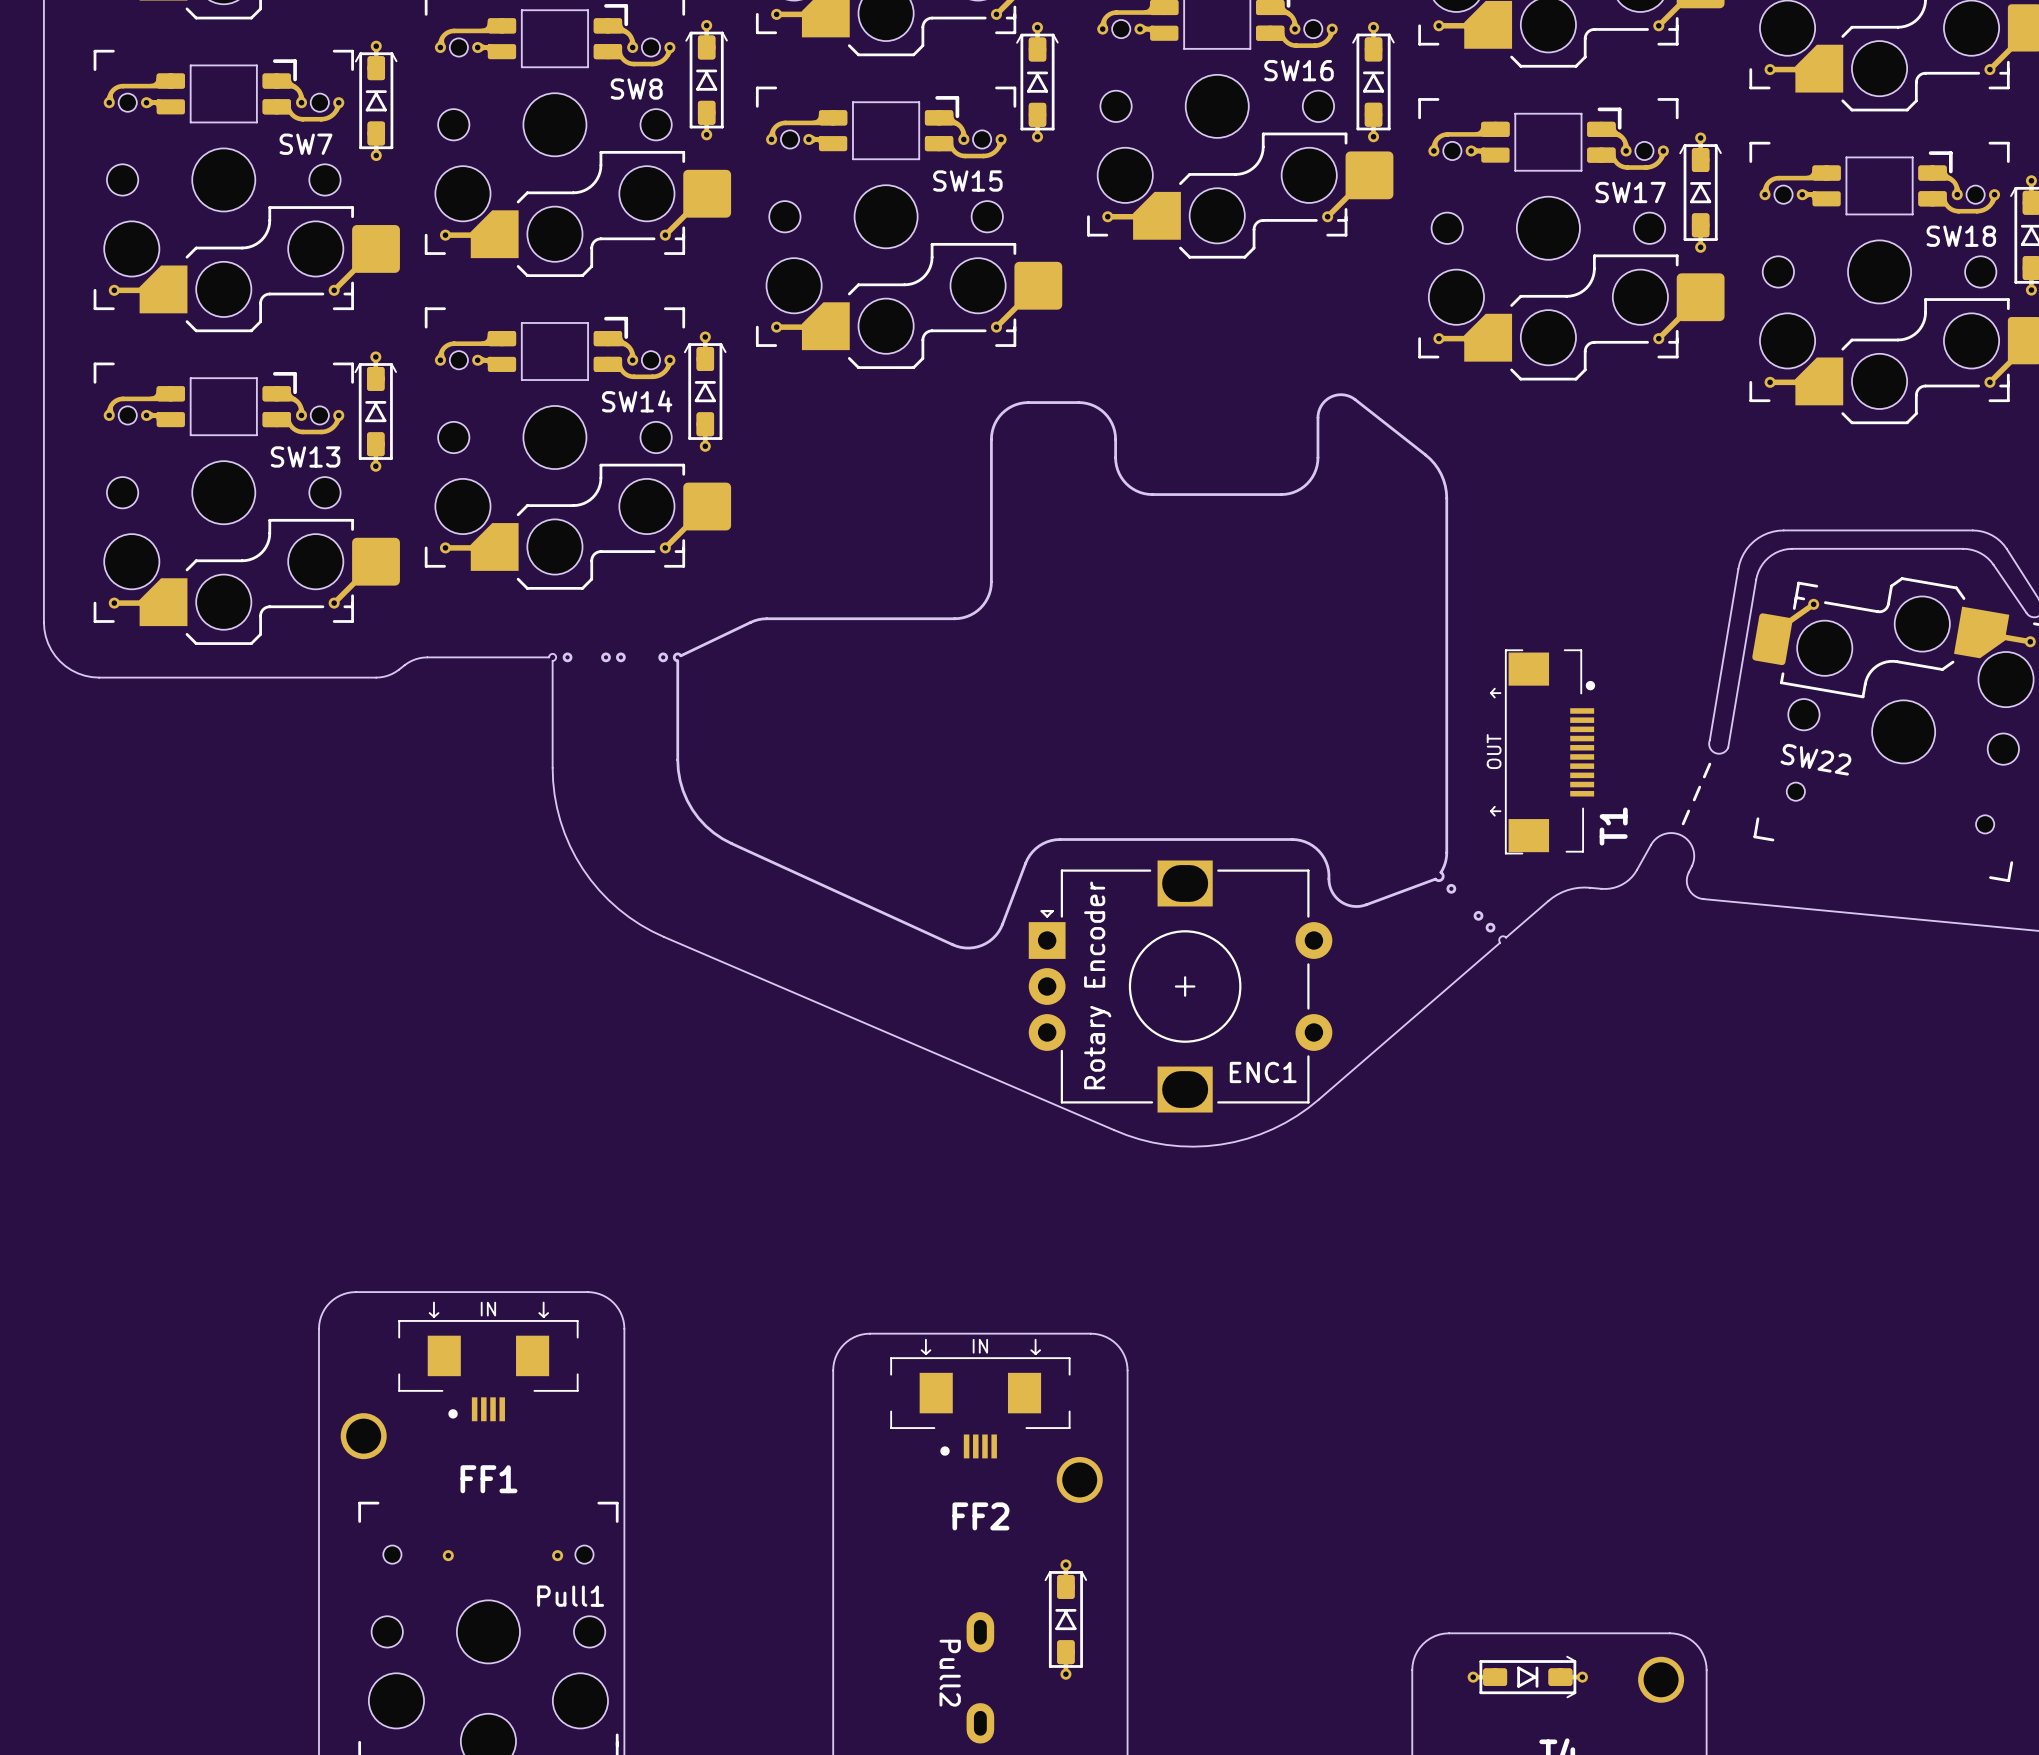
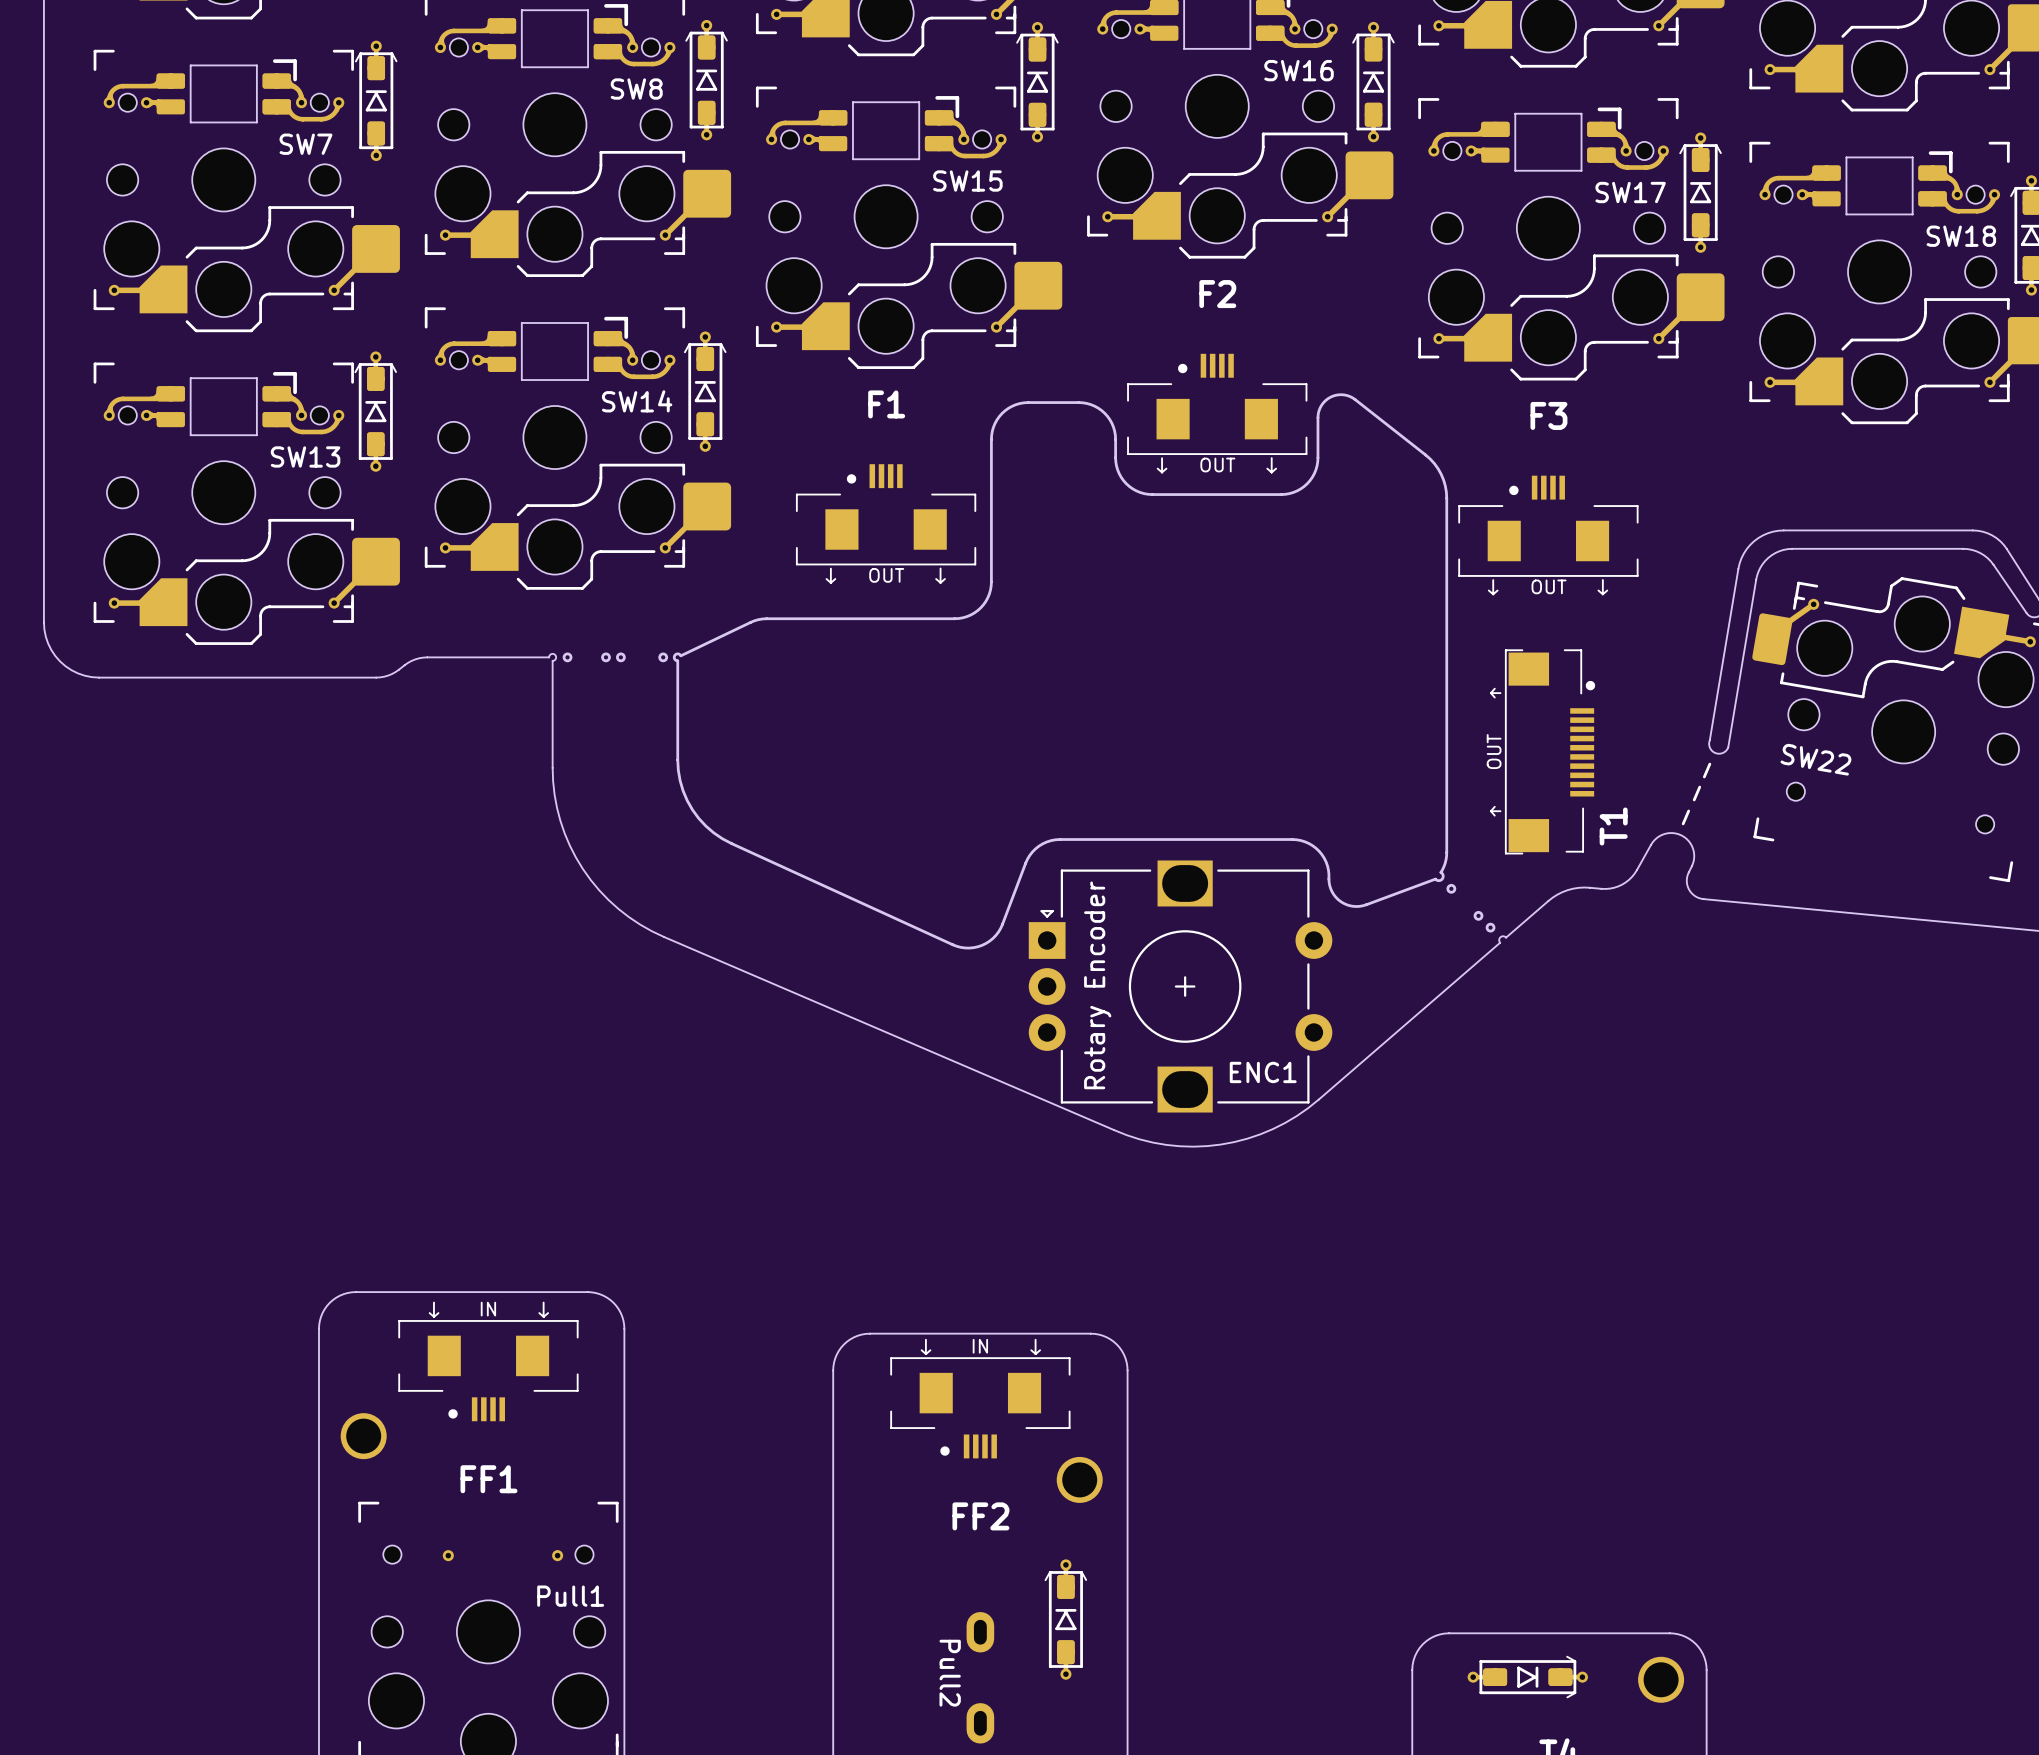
F2: none -> (1217, 413)
F1: none -> (886, 523)
F3: none -> (1548, 535)

